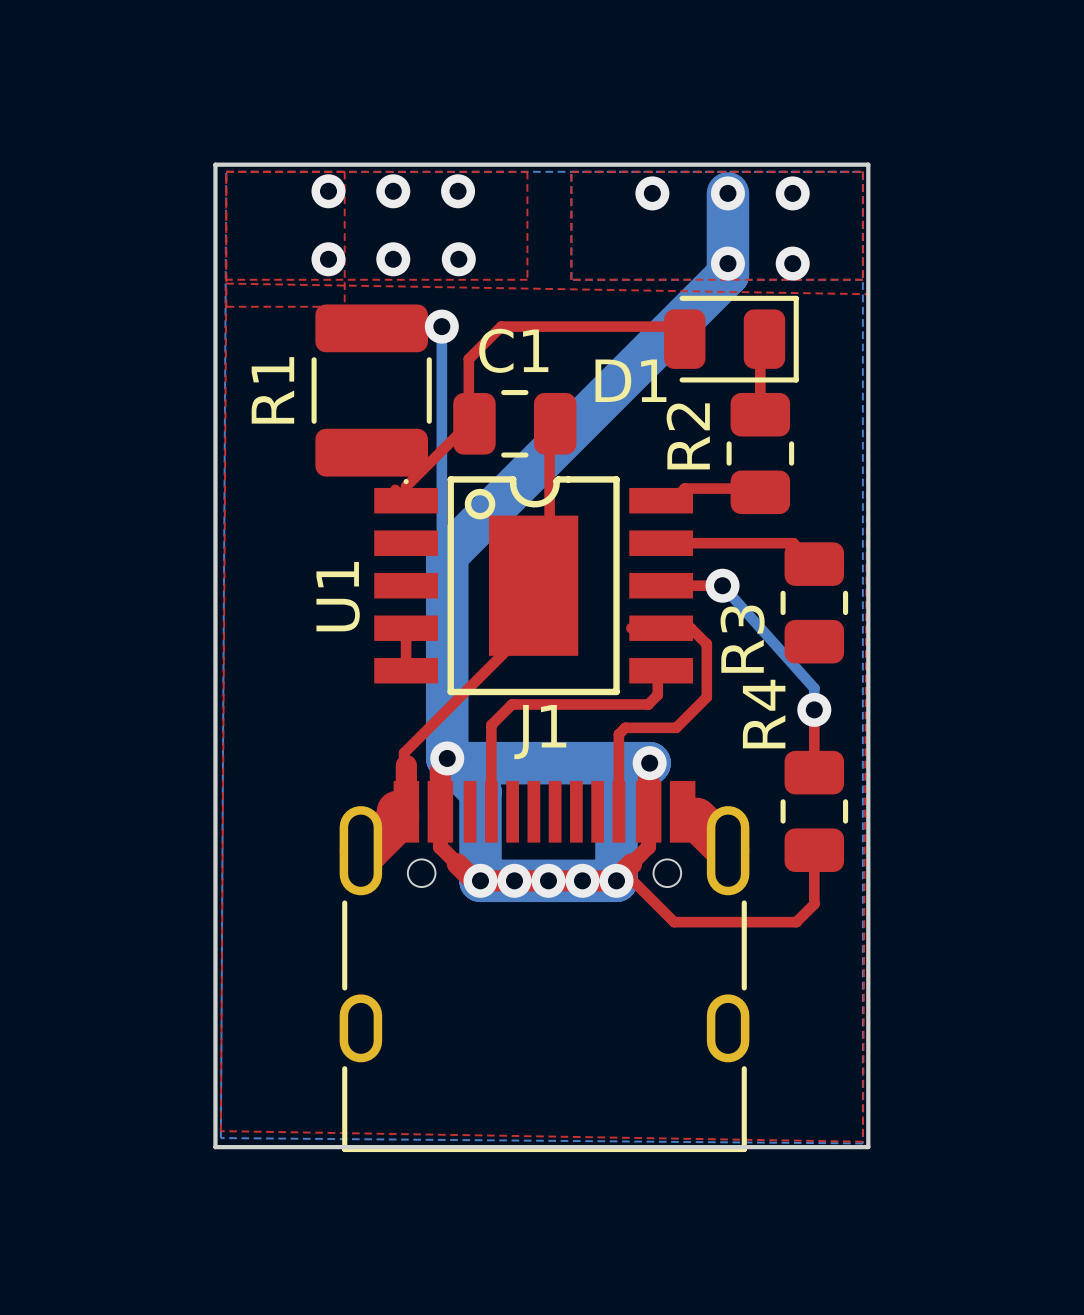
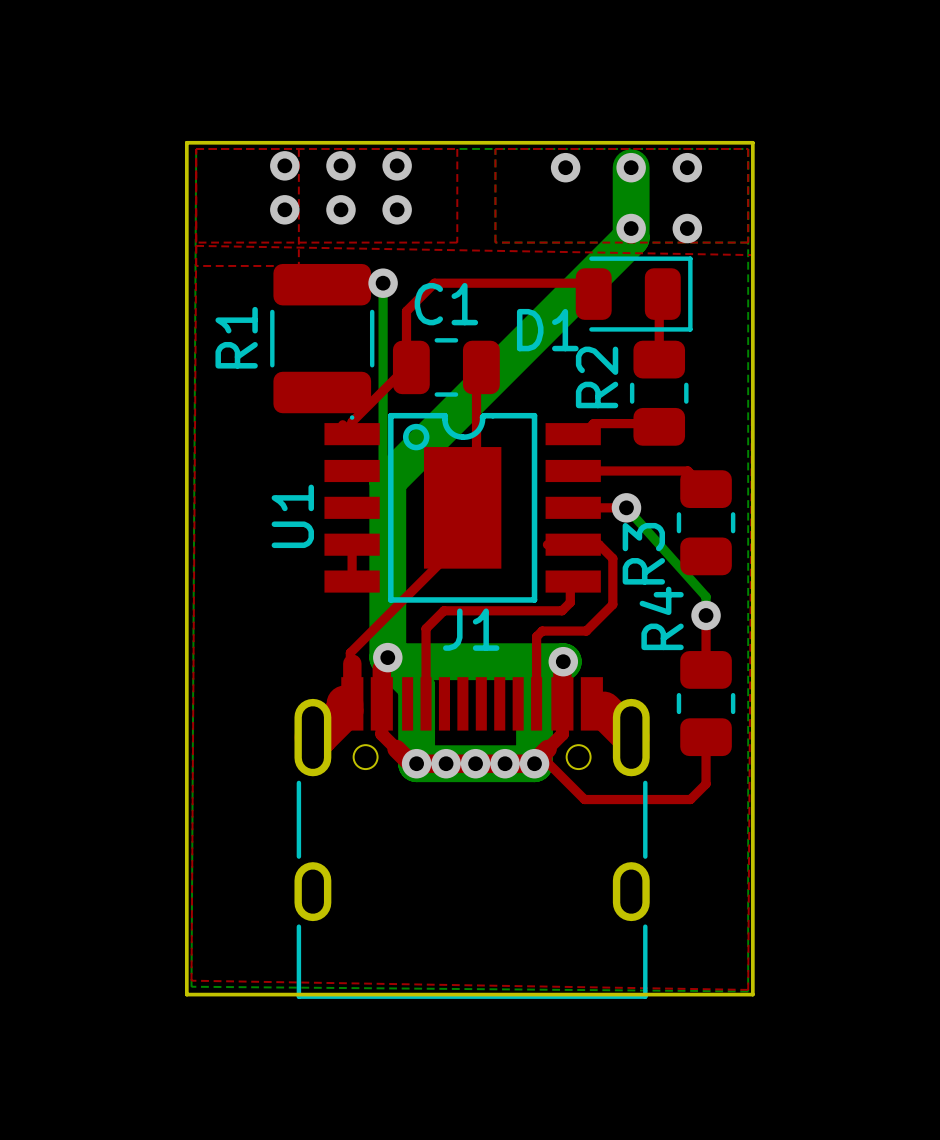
via position: (328, 259) -> (284, 209)
via position: (393, 259) -> (340, 209)
via position: (458, 259) -> (397, 209)

